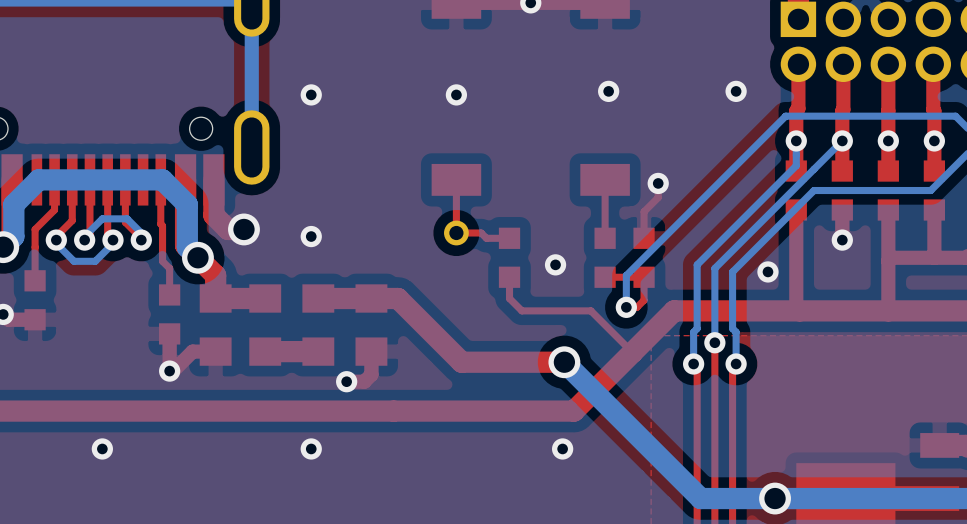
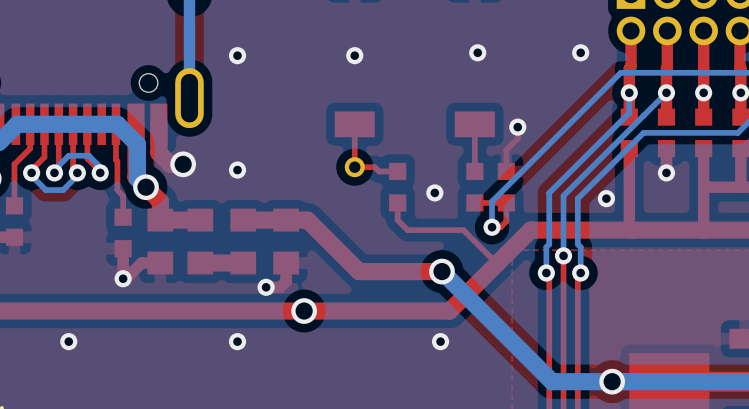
via: none -> (304, 311)

